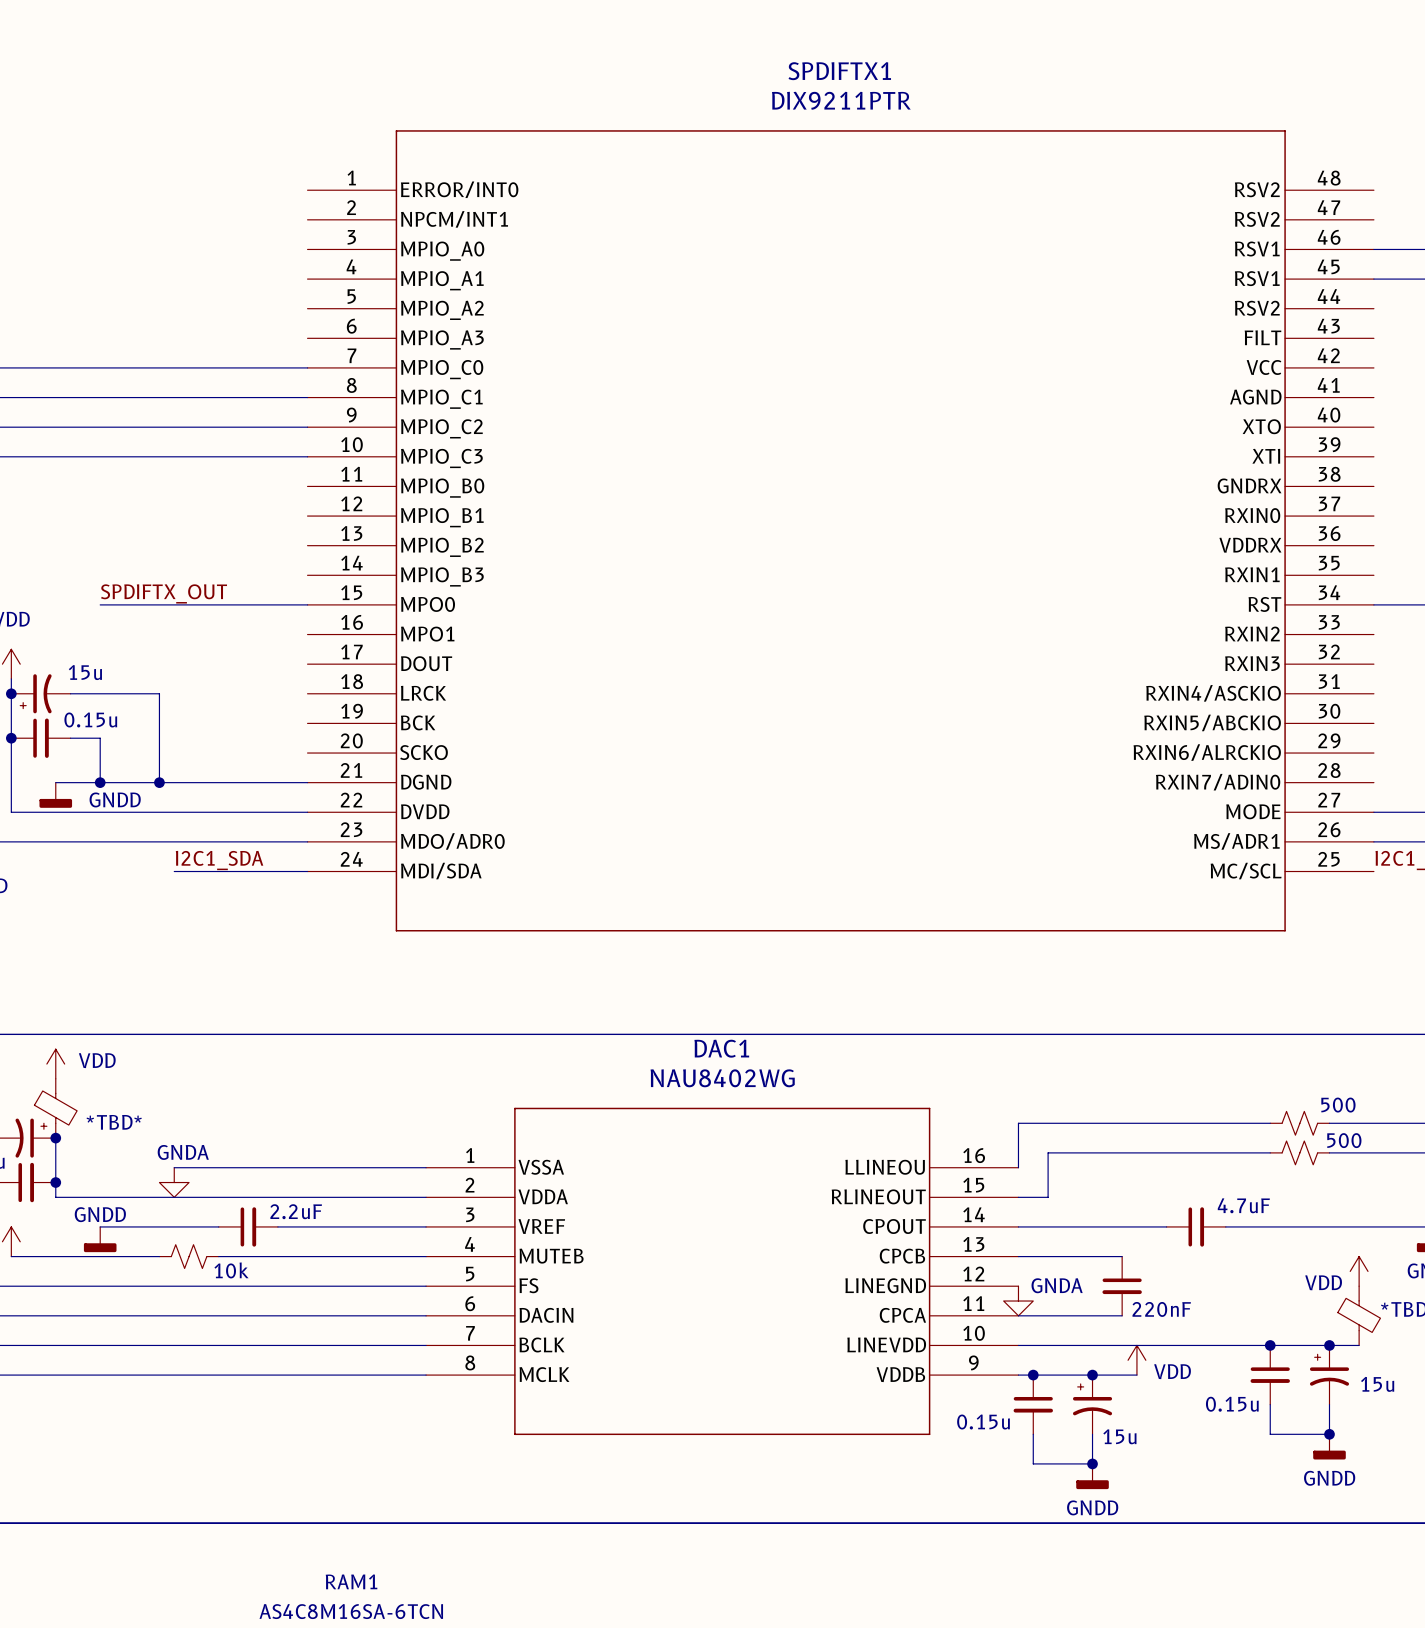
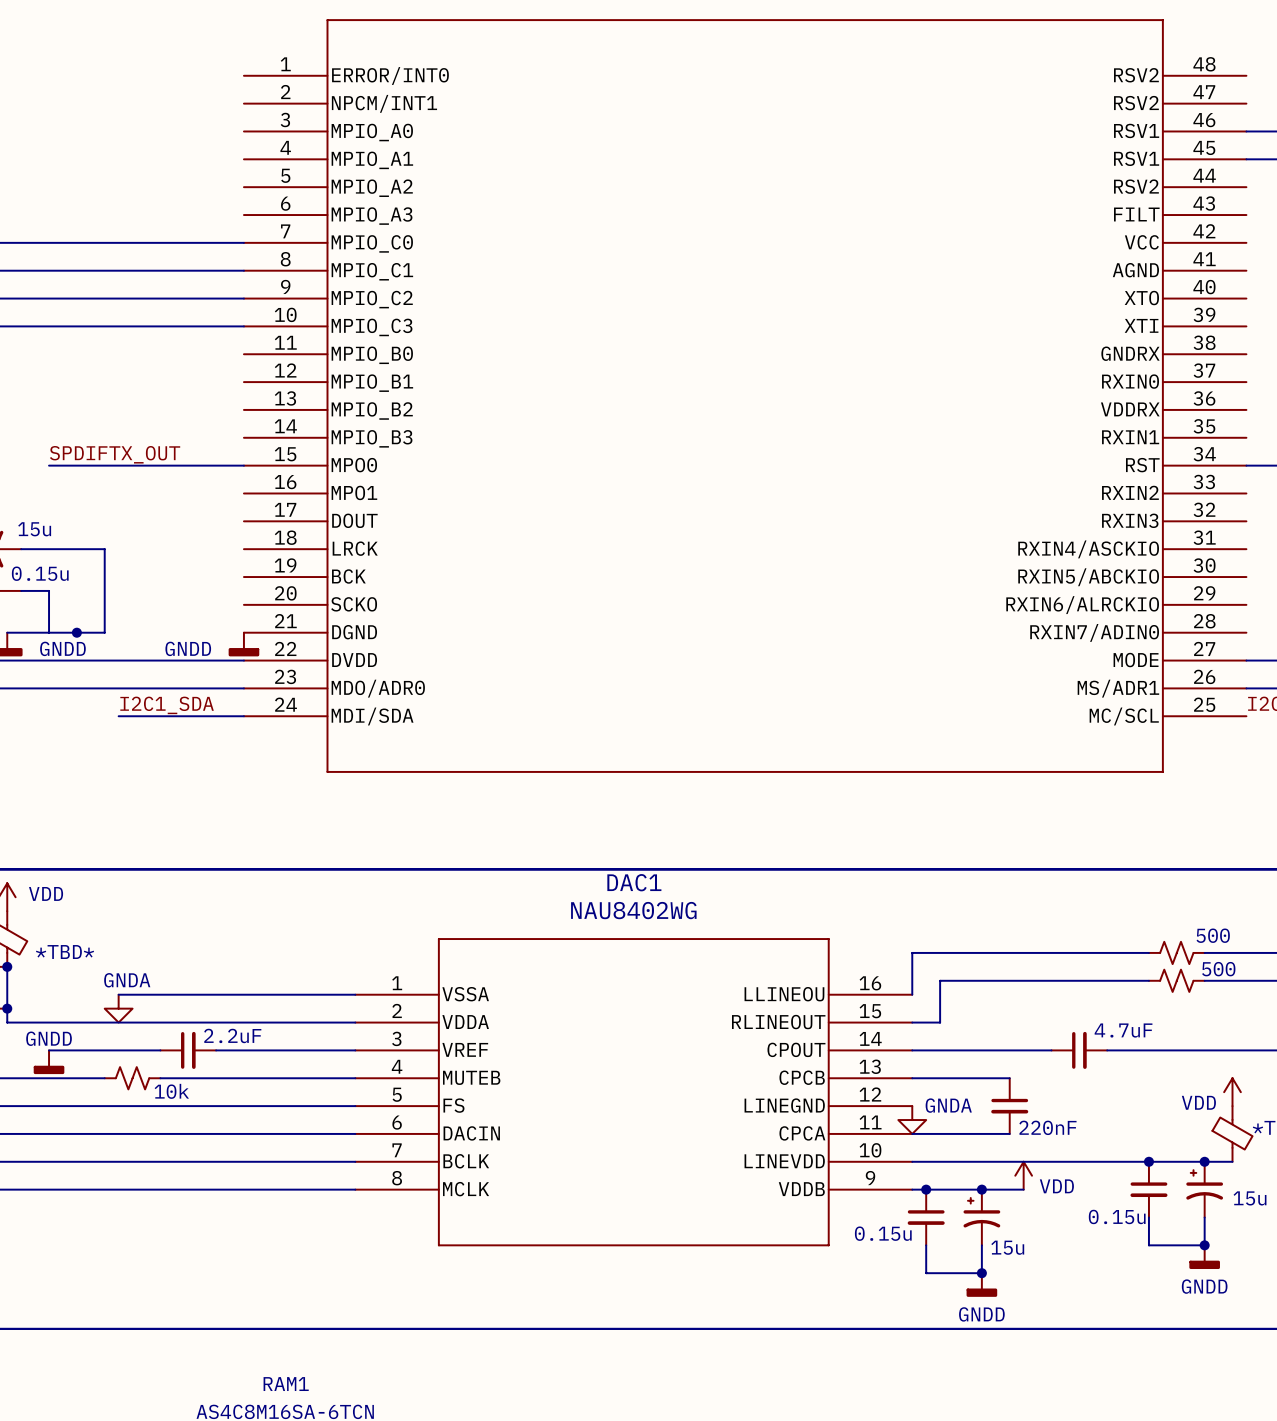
junction: (100, 782) -> none
junction: none -> (76, 632)
wire: (159, 782) (307, 782) -> none
junction: (159, 782) -> none
power symbol: none -> GNDD (243, 644)

